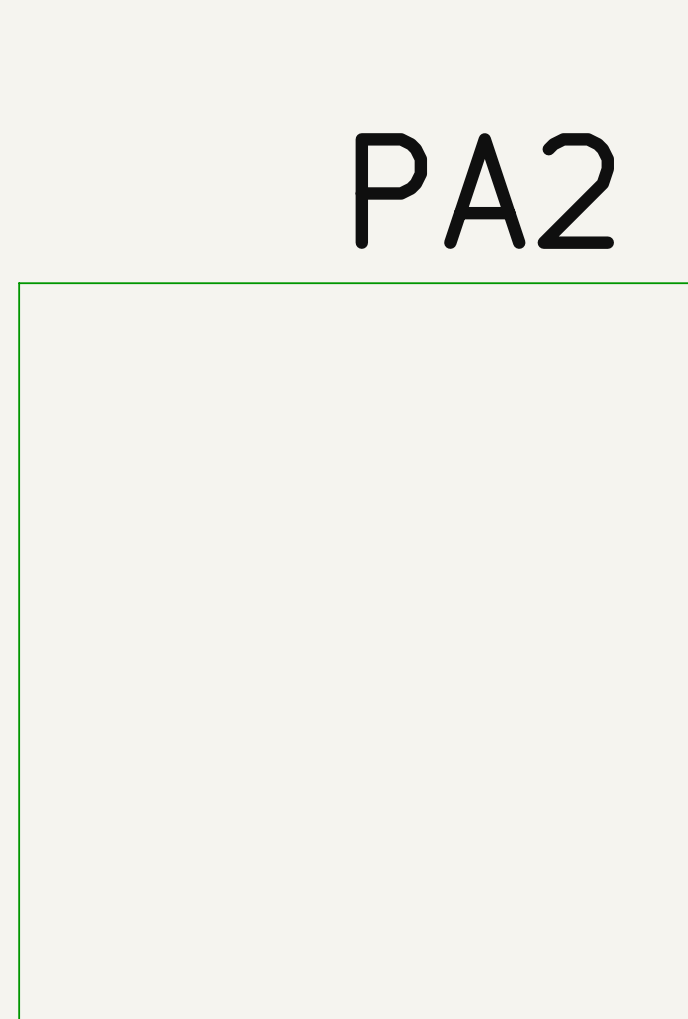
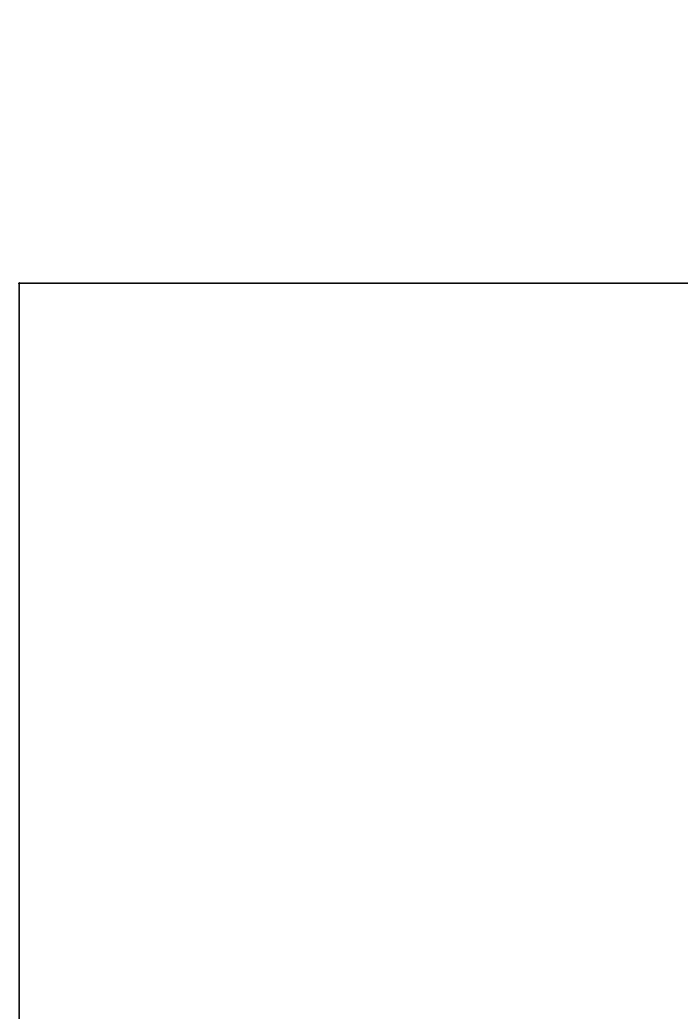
label: PA2 (484, 191) -> none

